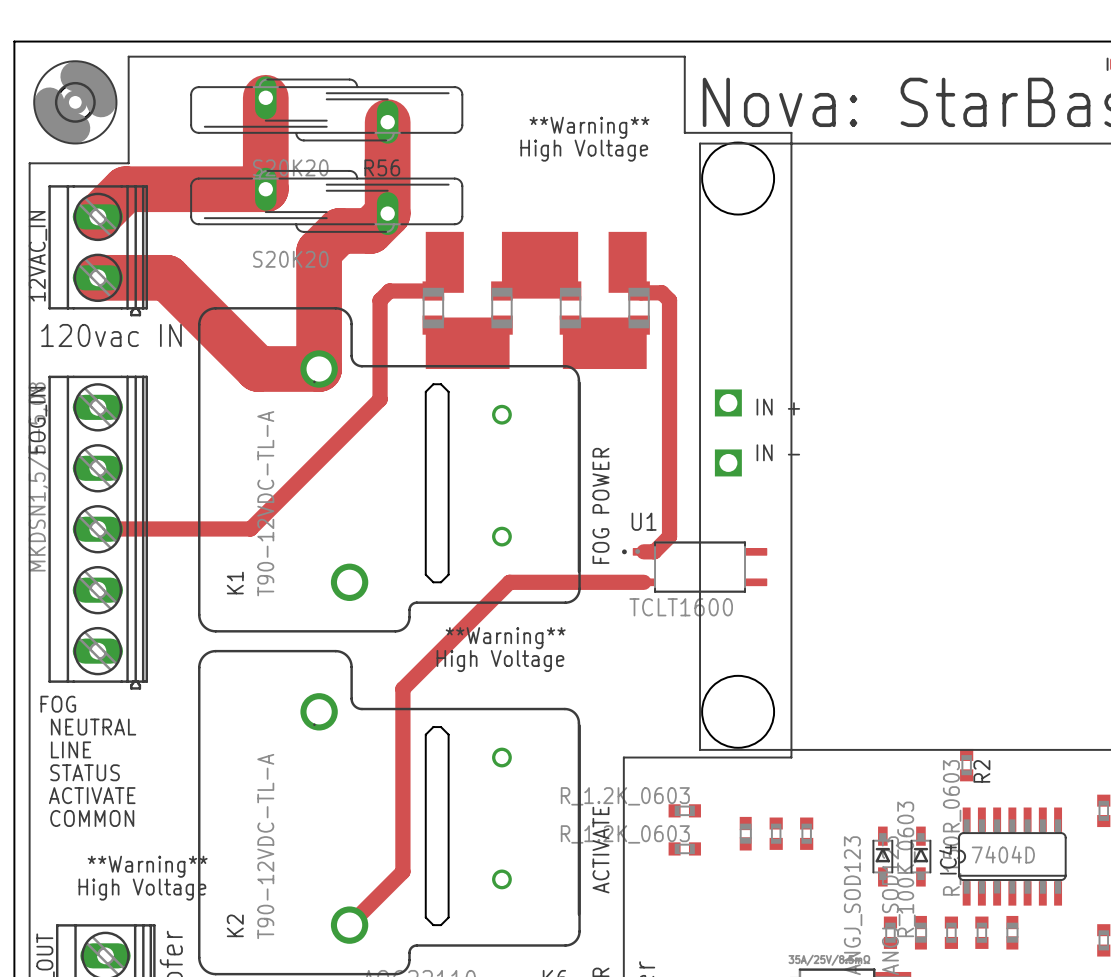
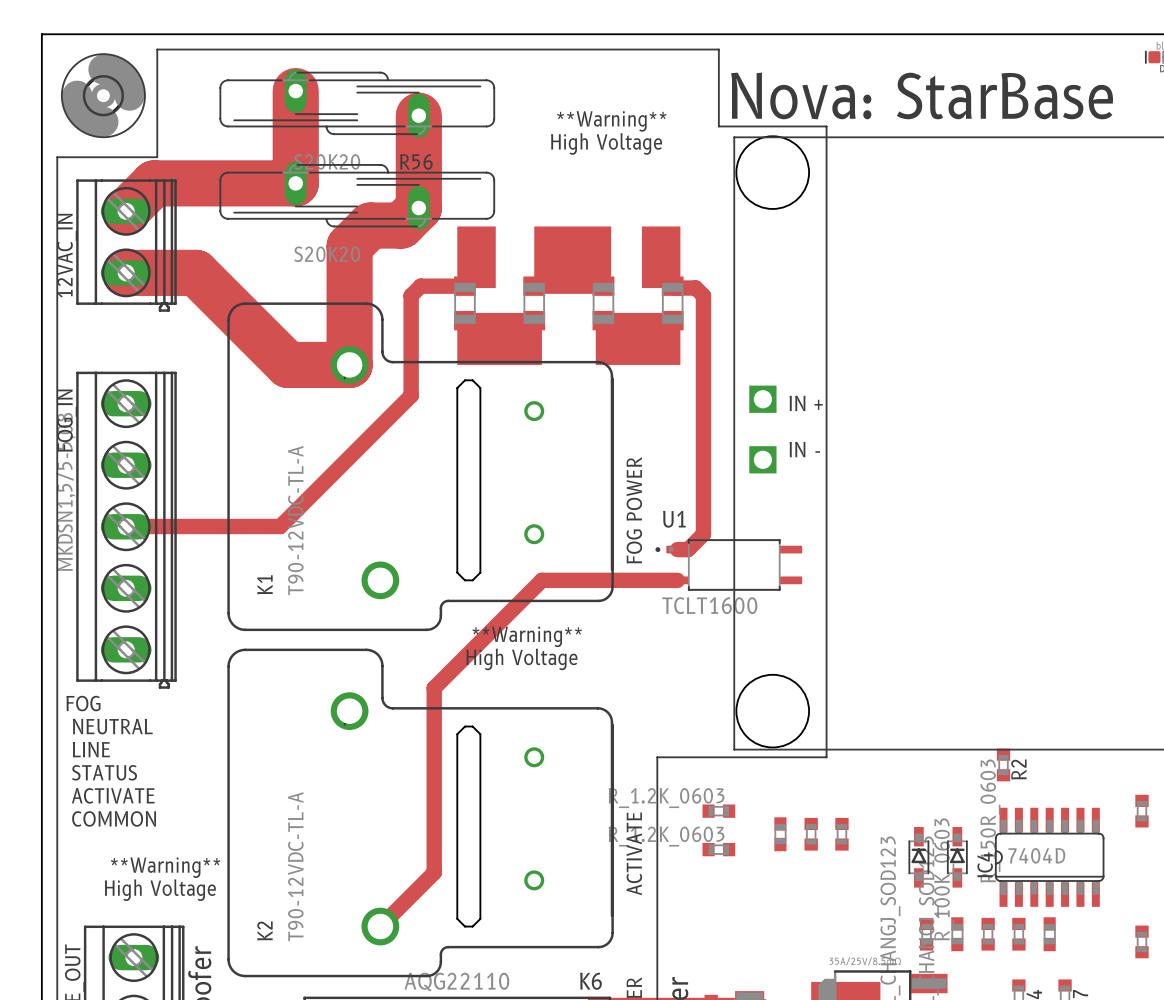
text: 120vac IN (111, 335) -> none

